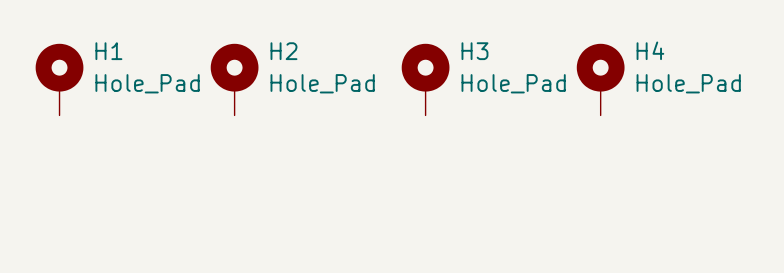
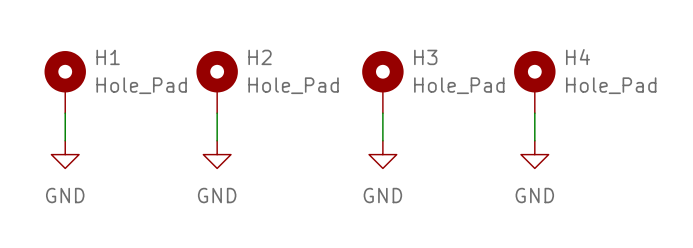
wire: none -> (65, 113) (65, 140)
wire: none -> (217, 113) (217, 140)
wire: none -> (382, 113) (382, 140)
wire: none -> (534, 113) (534, 140)
power symbol: none -> GND (65, 154)
power symbol: none -> GND (217, 154)
power symbol: none -> GND (382, 154)
power symbol: none -> GND (534, 154)

